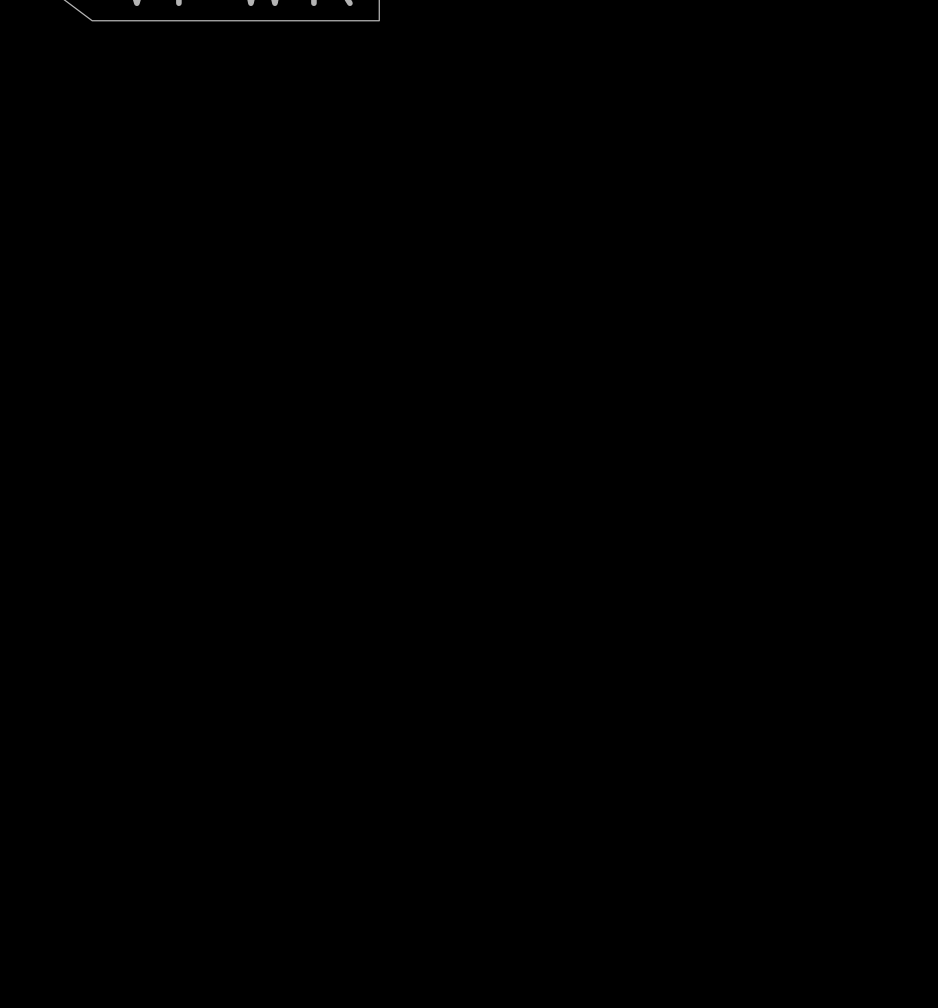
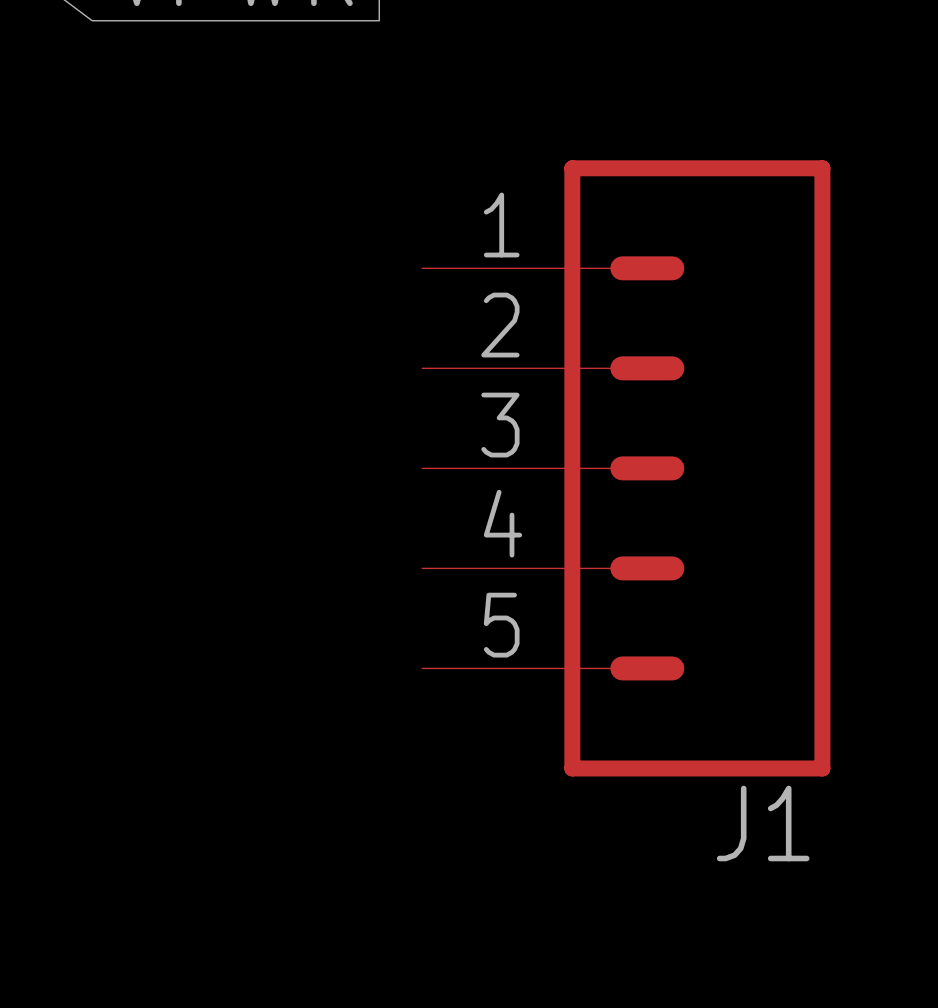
J1: none -> (626, 468)

